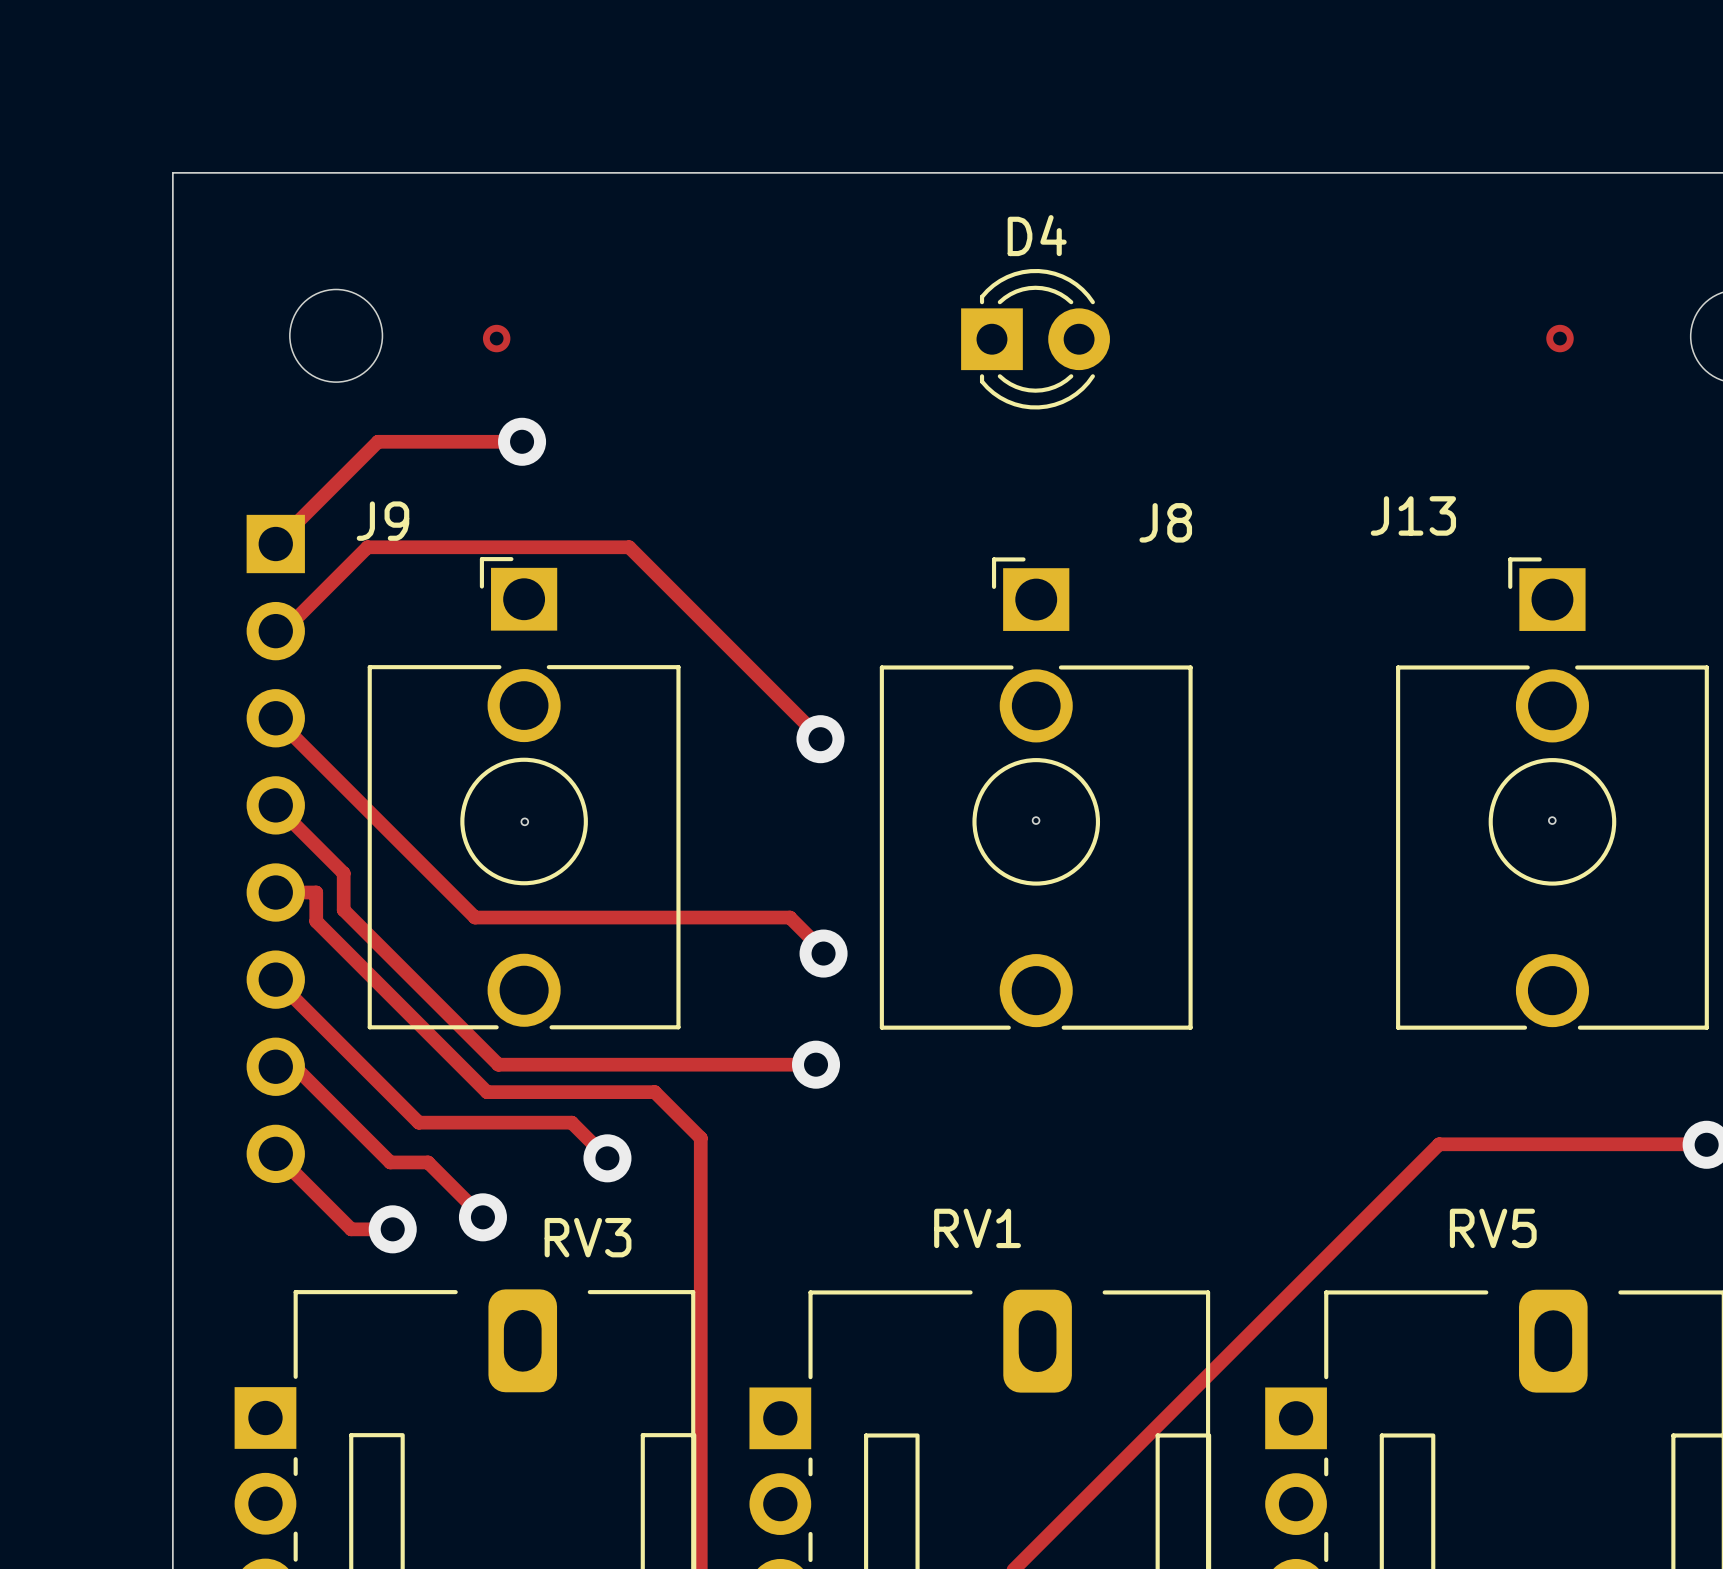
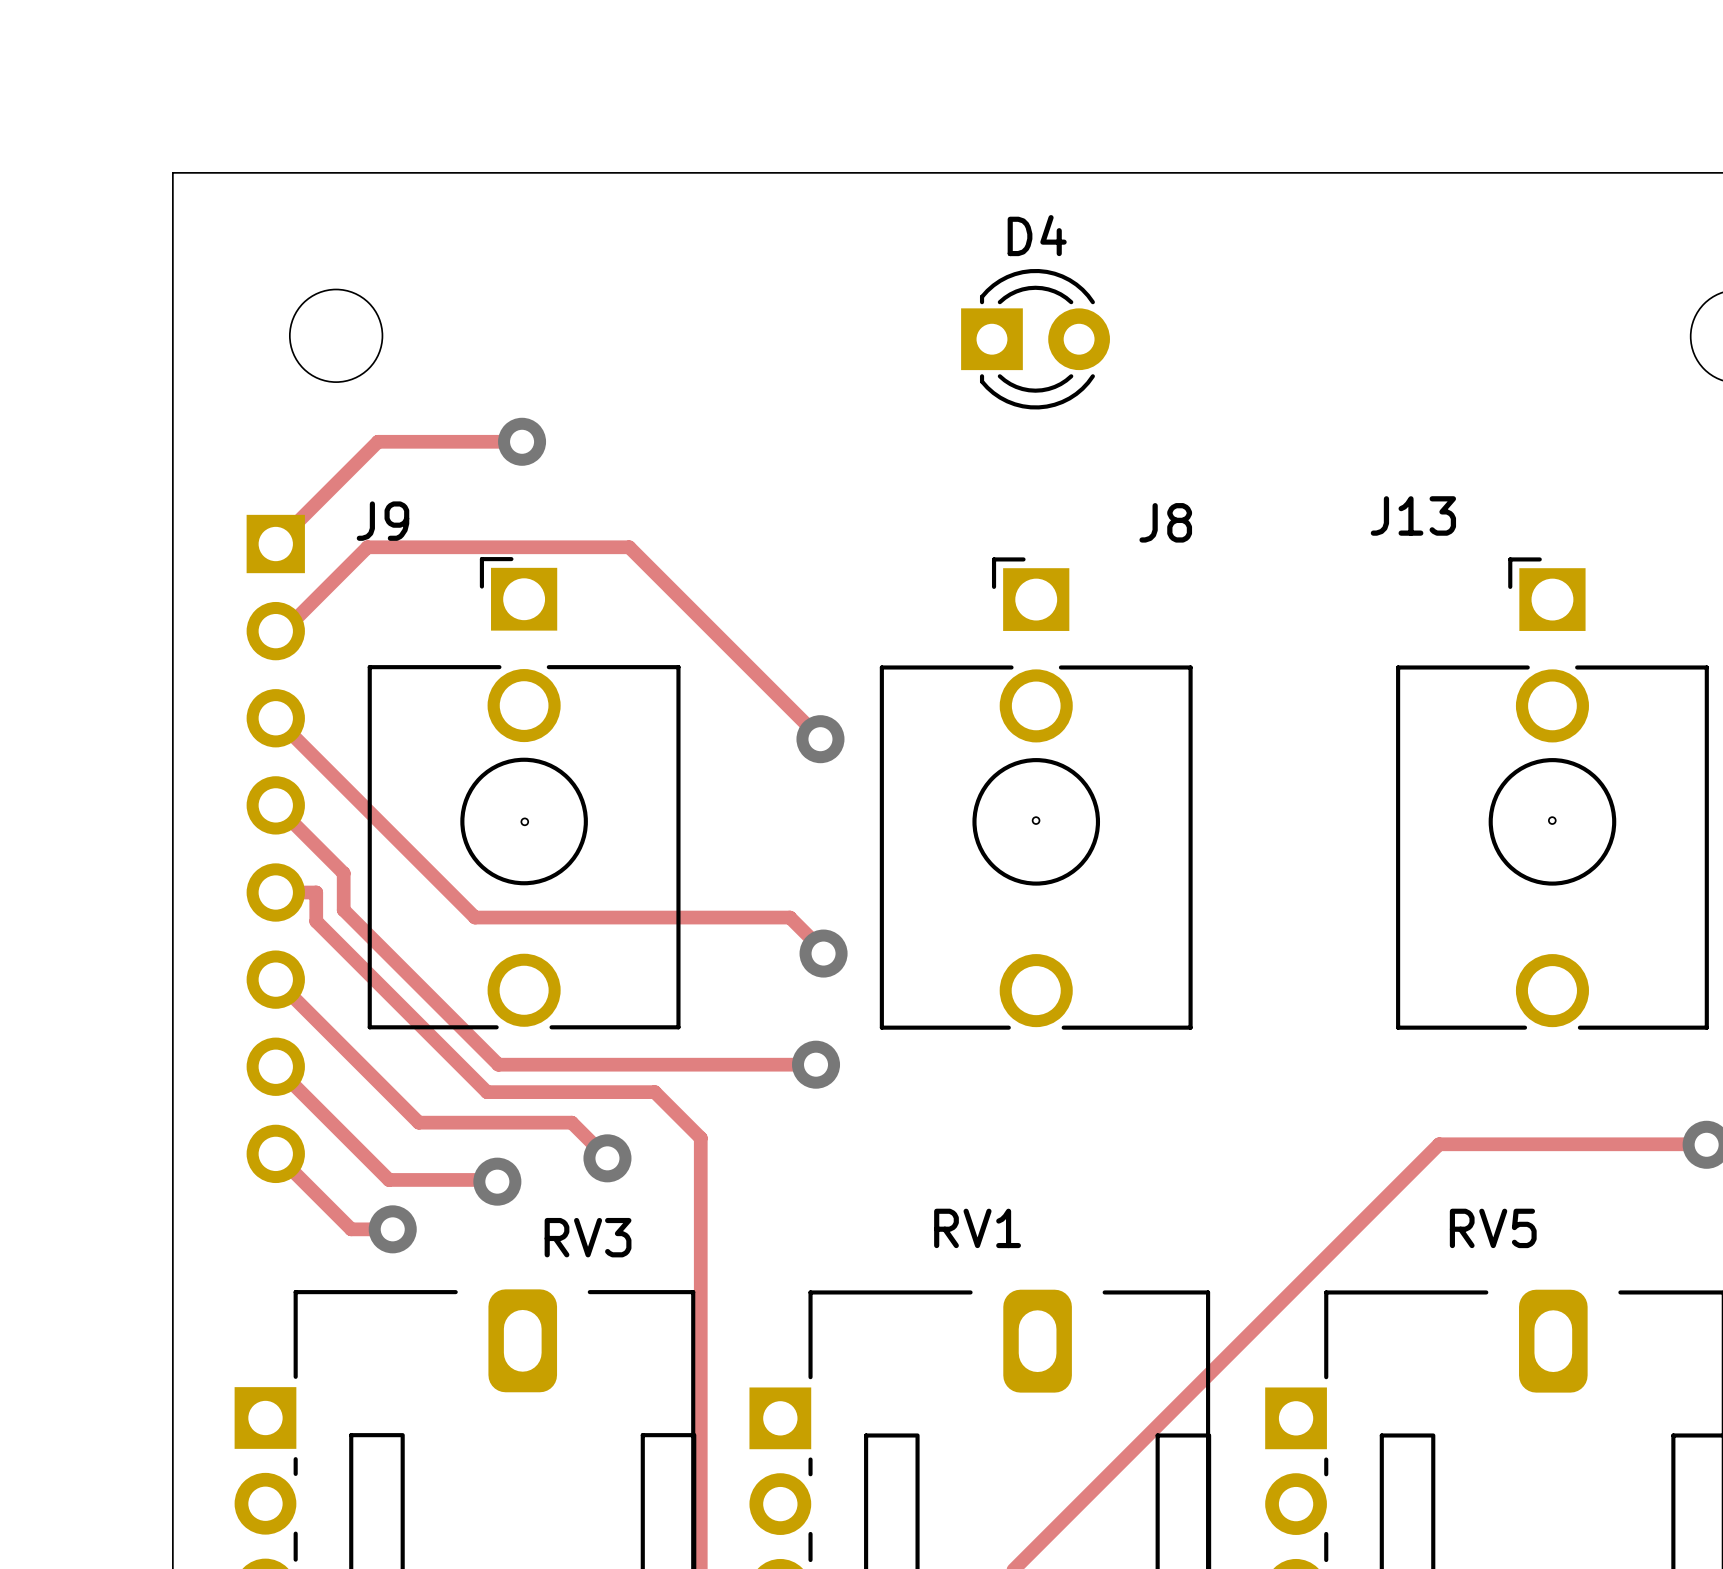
drawing: [482, 324, 511, 353] -> none
drawing: [1546, 324, 1574, 353] -> none
track: (275, 1066) (294, 1066) (390, 1162) (428, 1162) (482, 1217) -> (275, 1066) (388, 1179) (495, 1179) (497, 1181)
via position: (482, 1217) -> (497, 1181)

